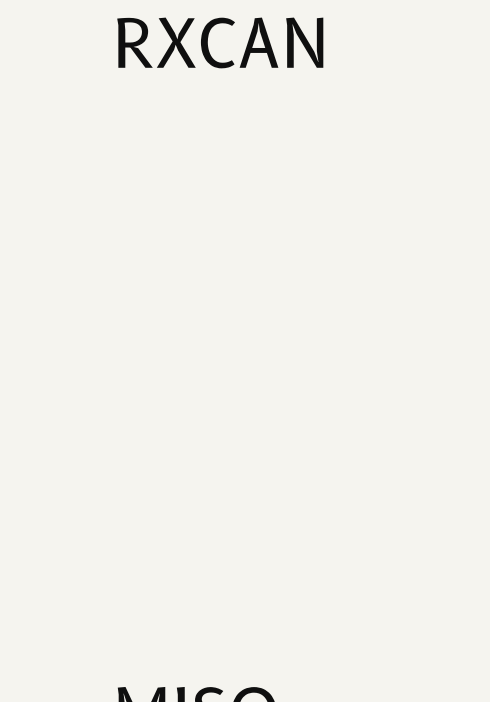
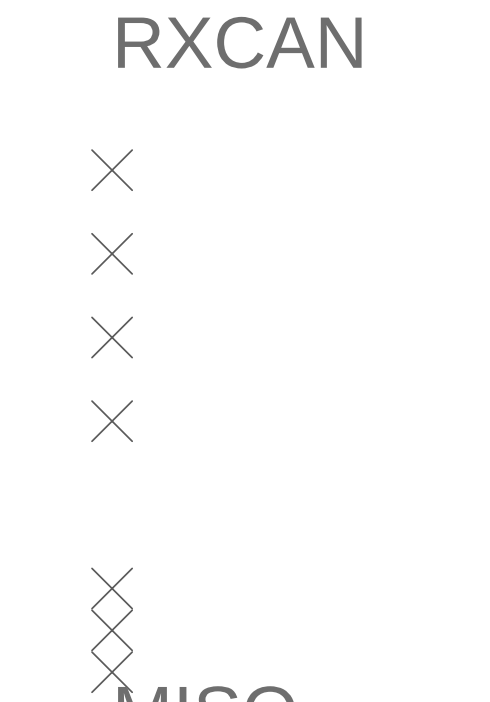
no-connect mark: none -> (112, 170)
no-connect mark: none -> (112, 253)
no-connect mark: none -> (112, 337)
no-connect mark: none -> (112, 421)
no-connect mark: none -> (112, 588)
no-connect mark: none -> (112, 630)
no-connect mark: none -> (112, 672)

